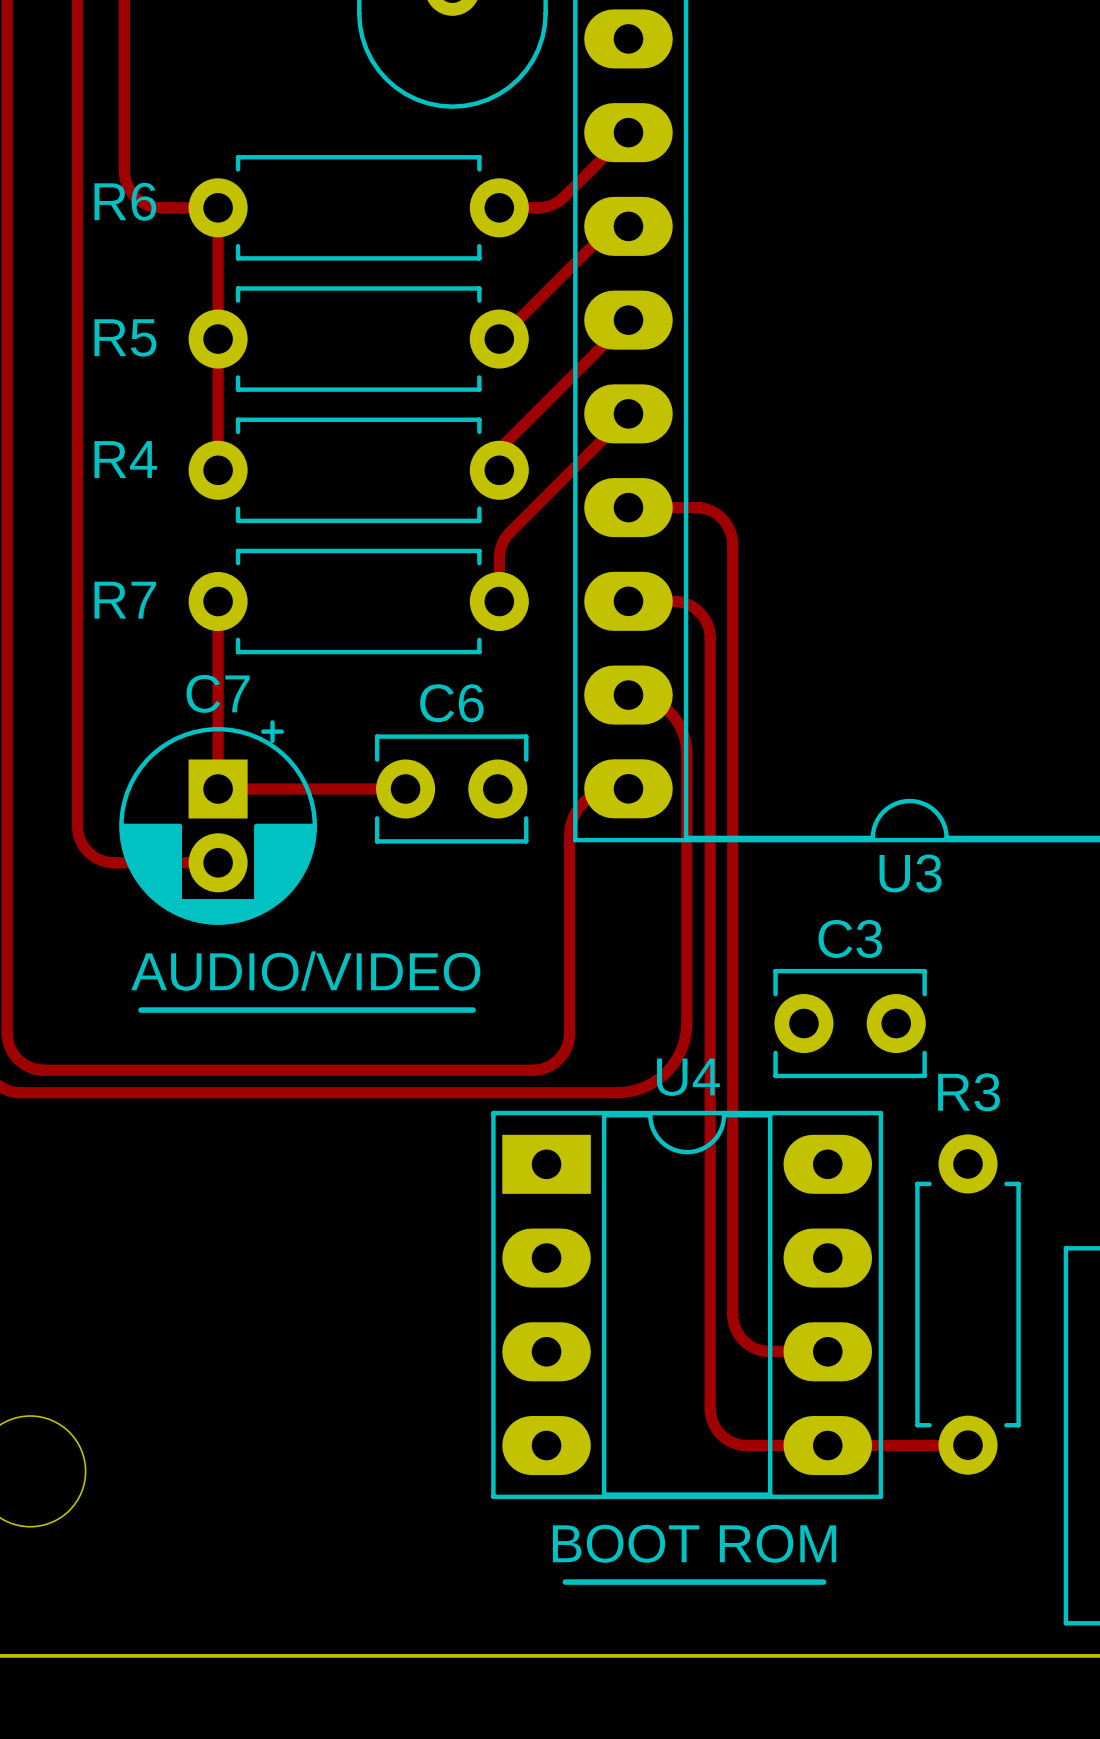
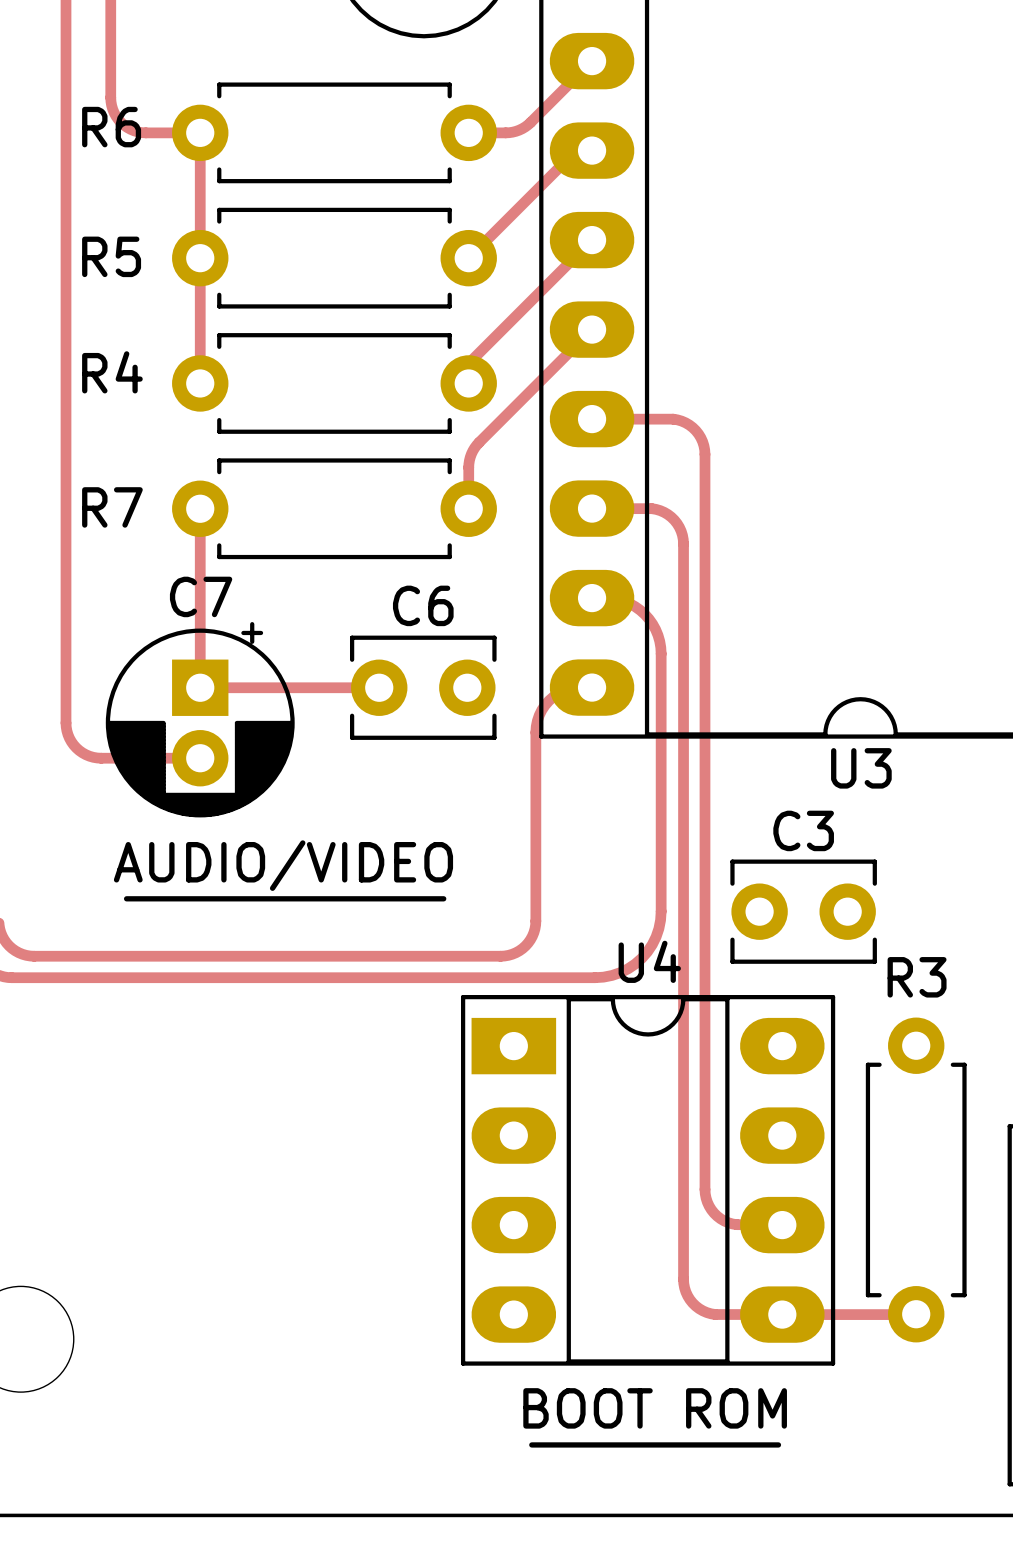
track: (699, 507) (712, 511) (723, 519) (730, 531) (732, 544) (732, 1319) (739, 1335) (749, 1345) (761, 1350) (780, 1351) -> (659, 419) (677, 419) (689, 424) (700, 437) (704, 450) (704, 1189) (707, 1202) (714, 1213) (724, 1221) (736, 1224)
track: (676, 601) (689, 605) (700, 613) (707, 624) (710, 638) (710, 1413) (714, 1426) (726, 1439) (739, 1444) (757, 1445) -> (638, 508) (656, 509) (667, 514) (677, 523) (683, 539) (683, 1279) (685, 1292) (692, 1303) (702, 1310) (715, 1314)
track: (628, 695) (647, 698) (664, 707) (677, 722) (685, 740) (686, 1023) (681, 1049) (666, 1072) (643, 1087) (617, 1092) -> (605, 598) (623, 601) (640, 610) (652, 624) (659, 641) (661, 911) (656, 936) (647, 951) (635, 964) (612, 975) (581, 977)

